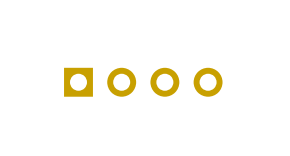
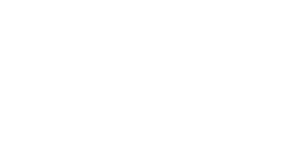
part: (143, 82) -> none

